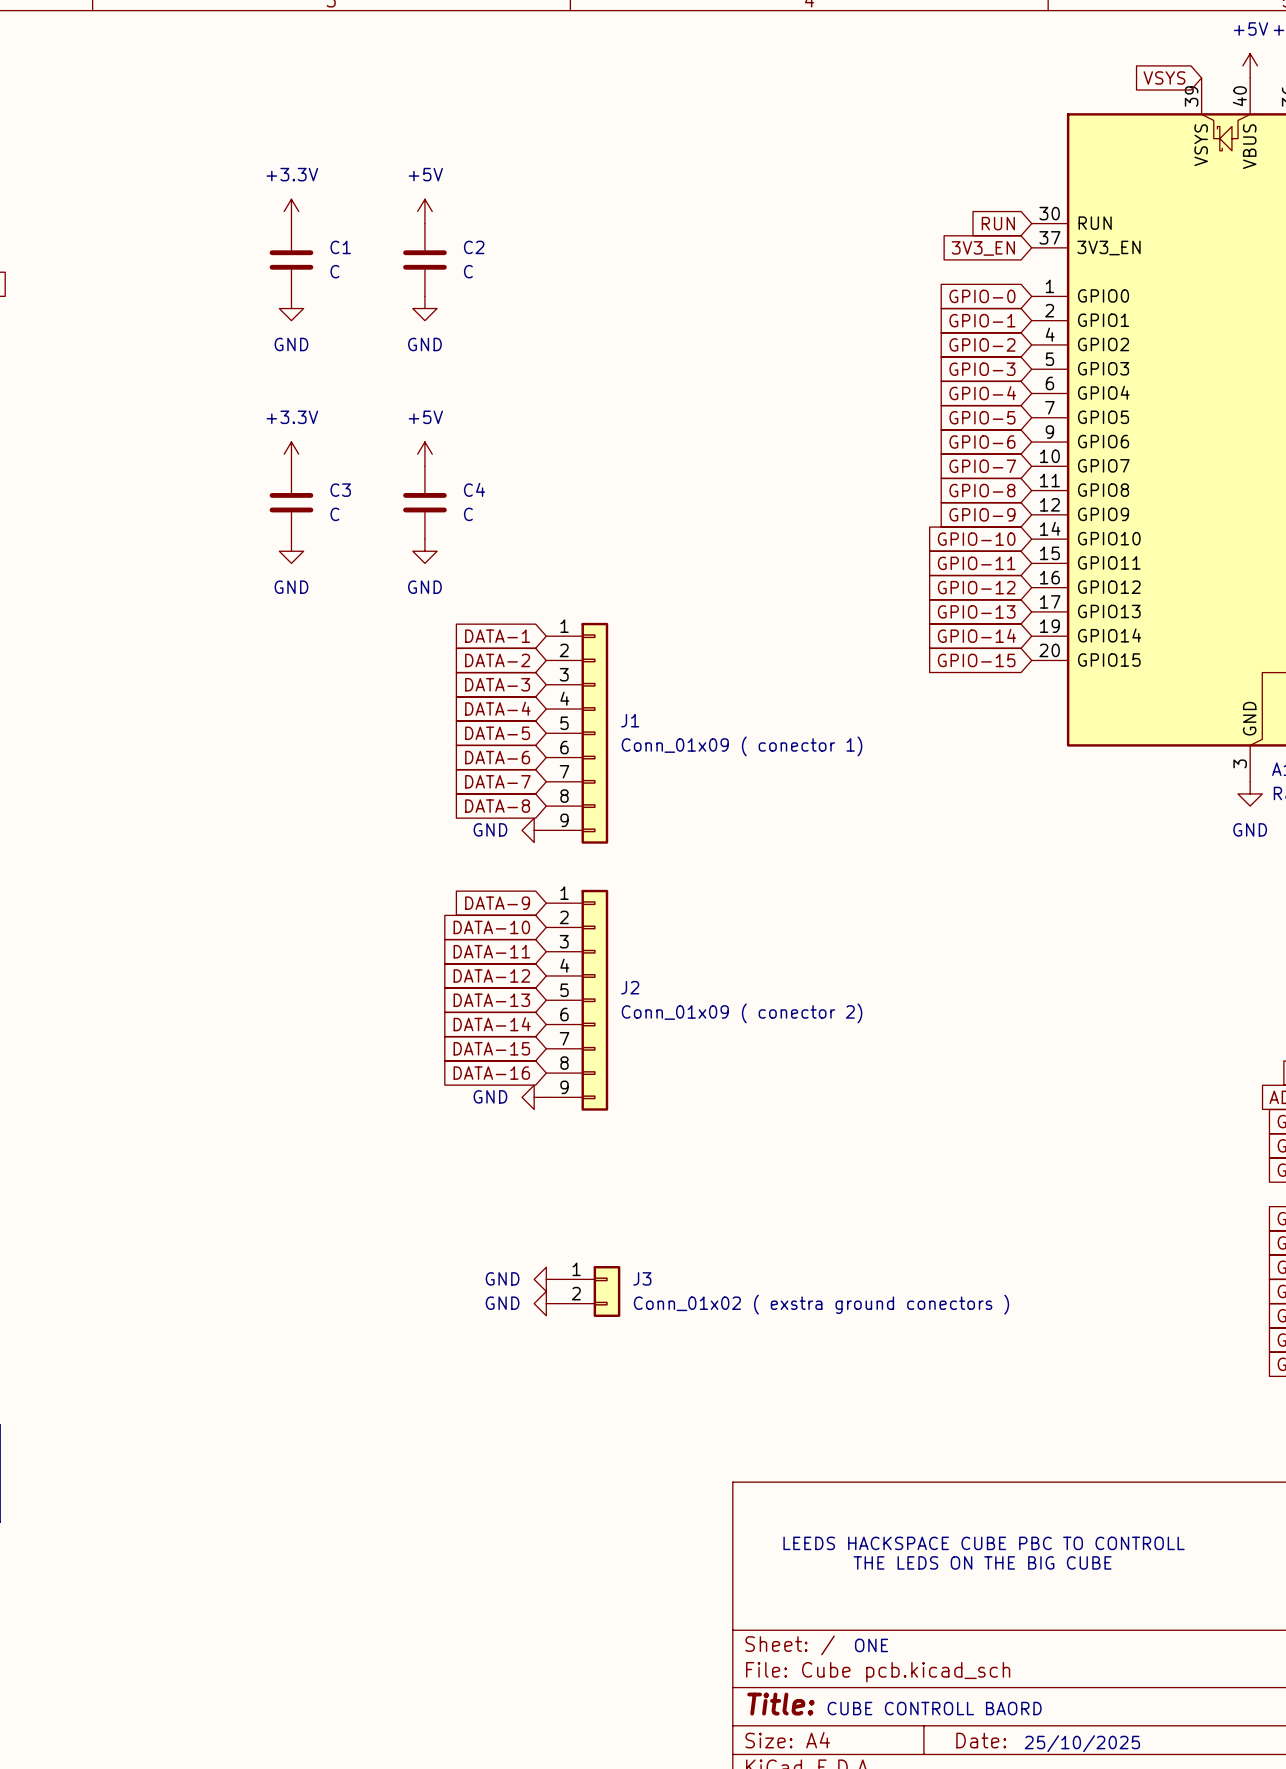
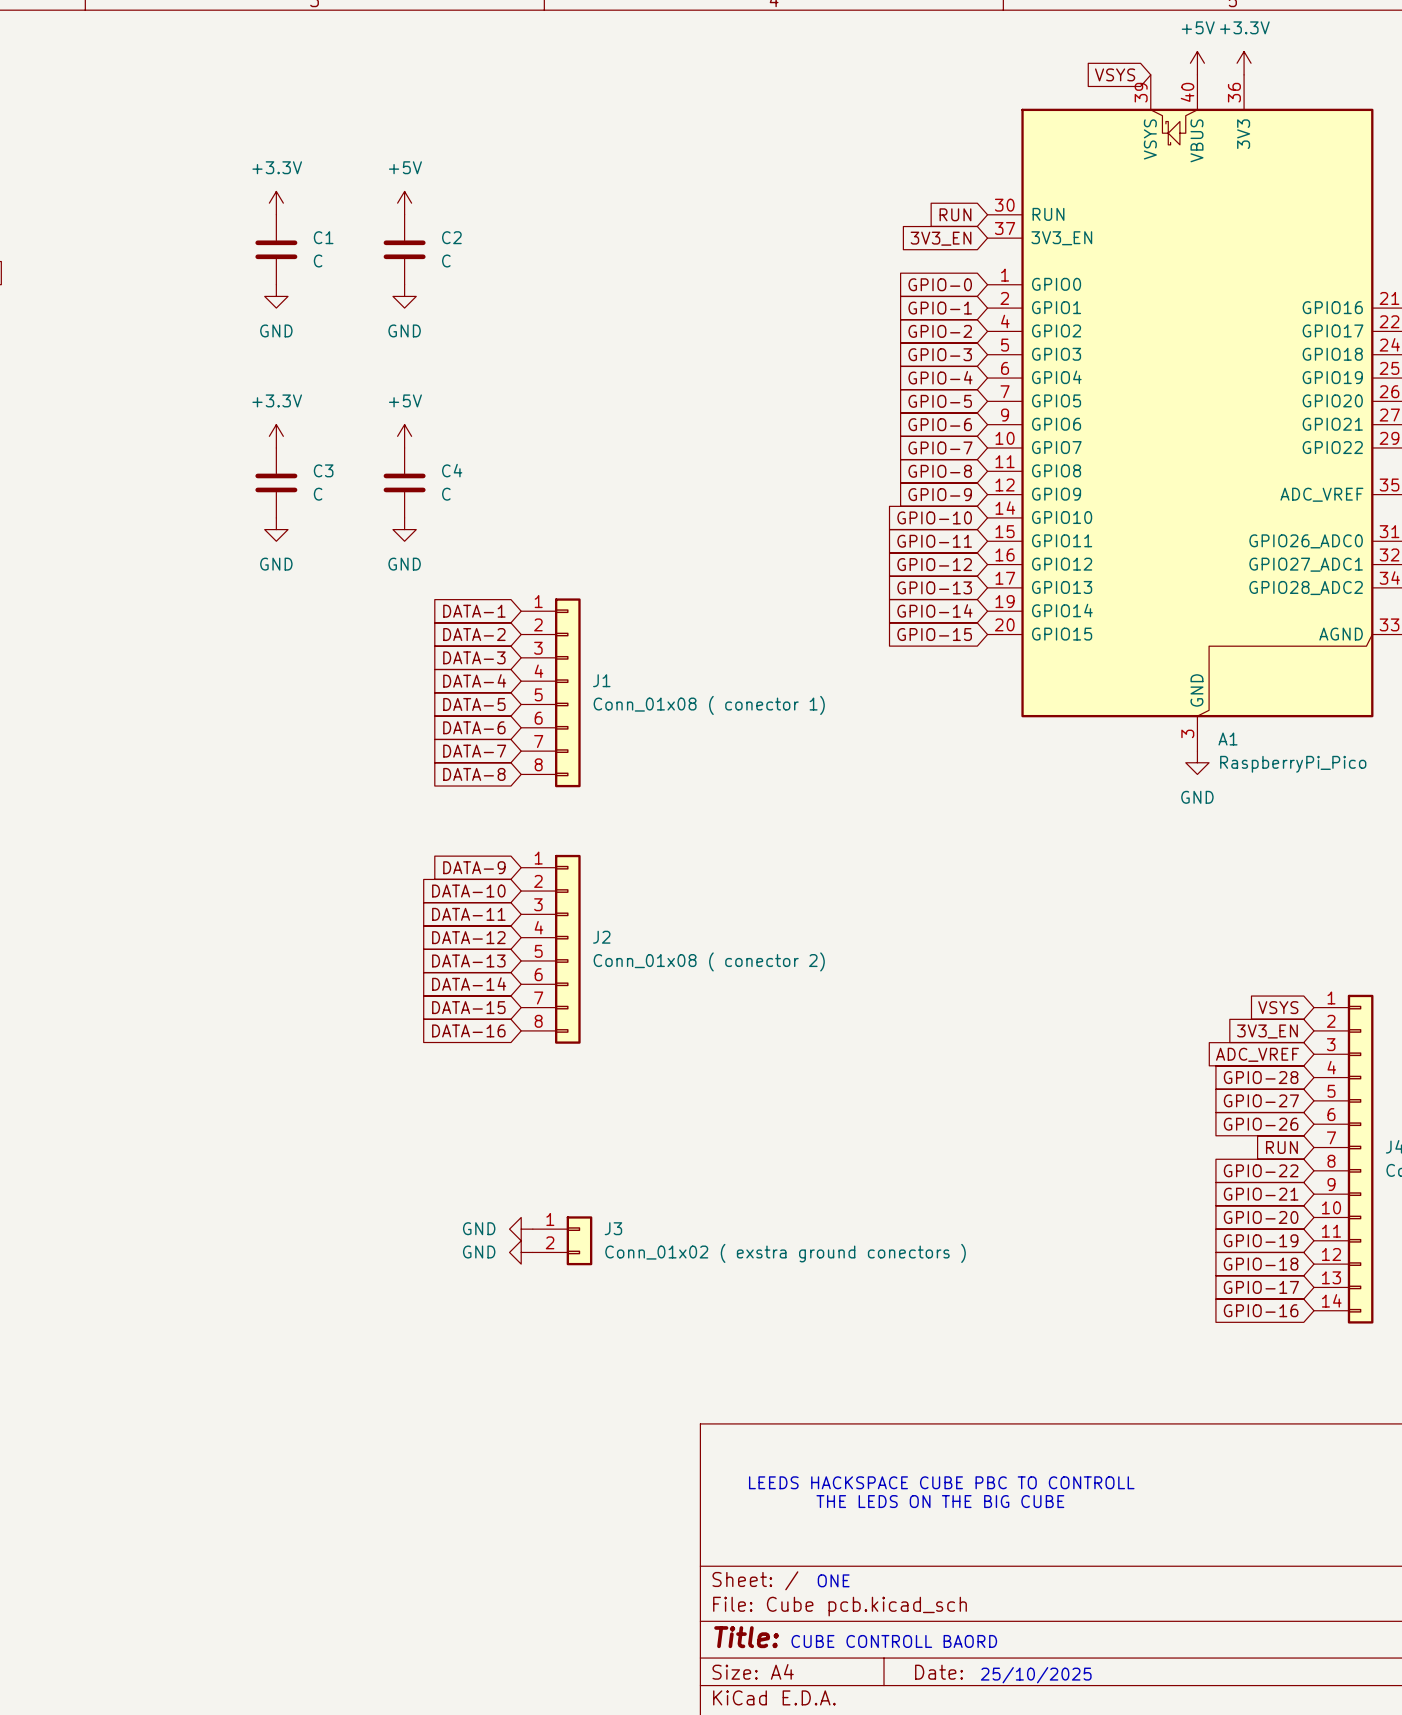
J1 symbol: [546, 622, 609, 844] -> [521, 598, 581, 788]
J1 value: Conn_01x09 ( conector 1) (742, 746) -> Conn_01x08 ( conector 1) (709, 705)
power symbol: GND (534, 830) -> none
J2 symbol: [546, 889, 609, 1111] -> [521, 854, 581, 1044]
J2 value: Conn_01x09 ( conector 2) (742, 1013) -> Conn_01x08 ( conector 2) (709, 961)
power symbol: GND (534, 1097) -> none

